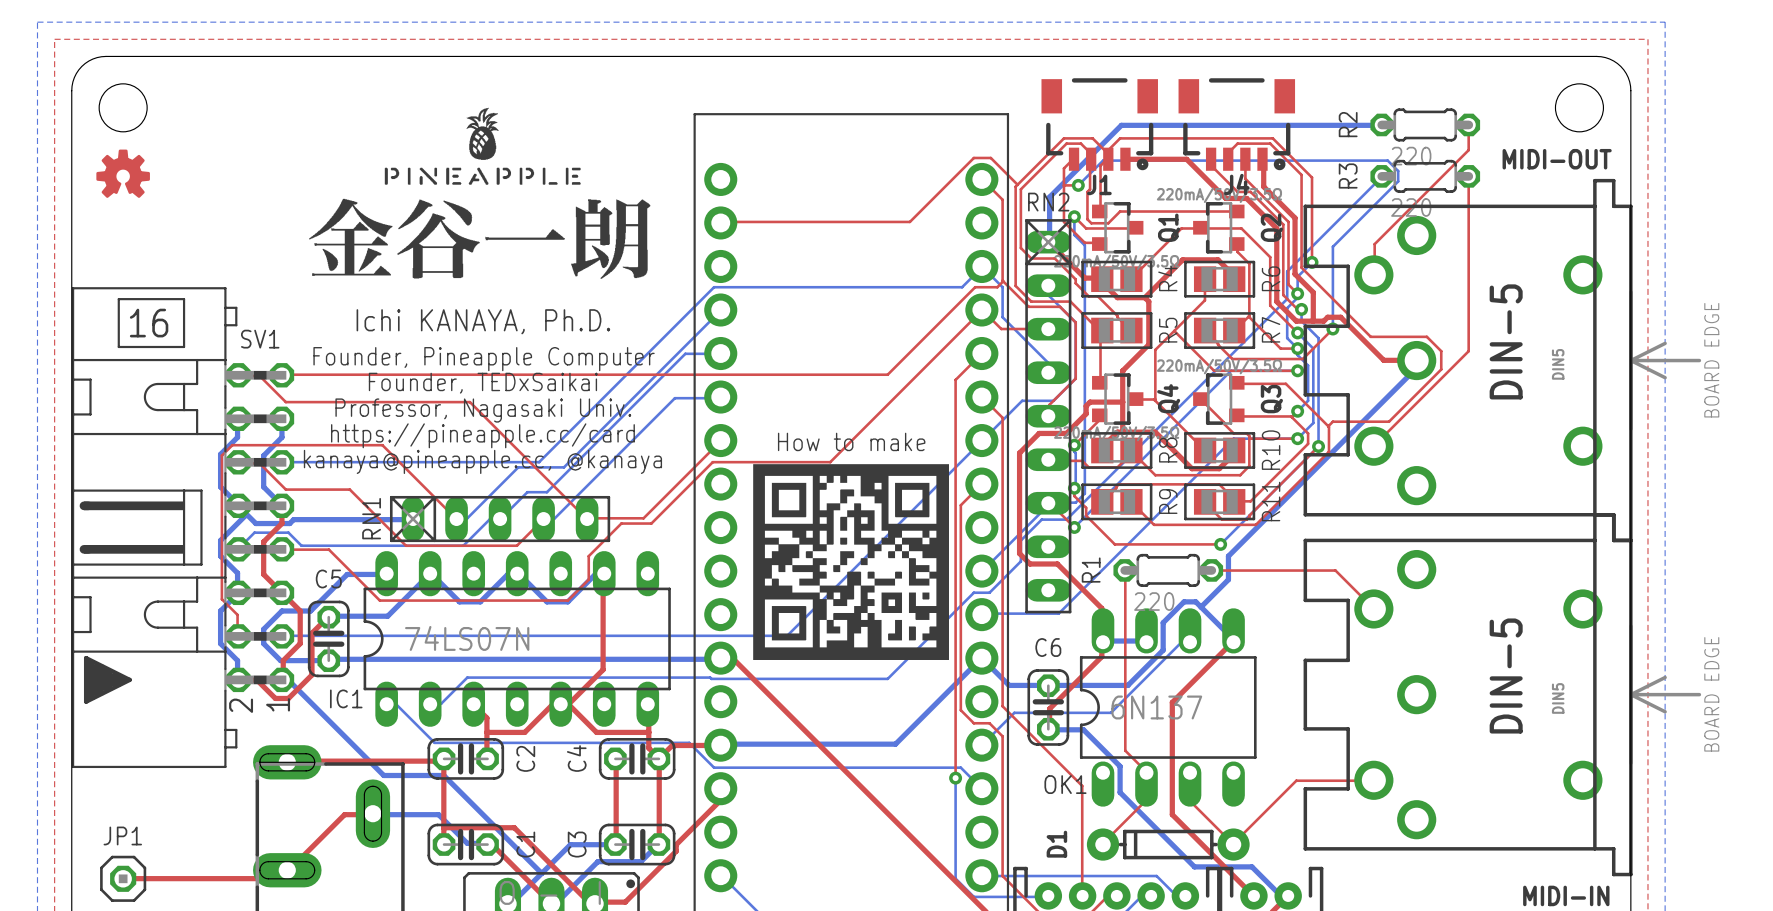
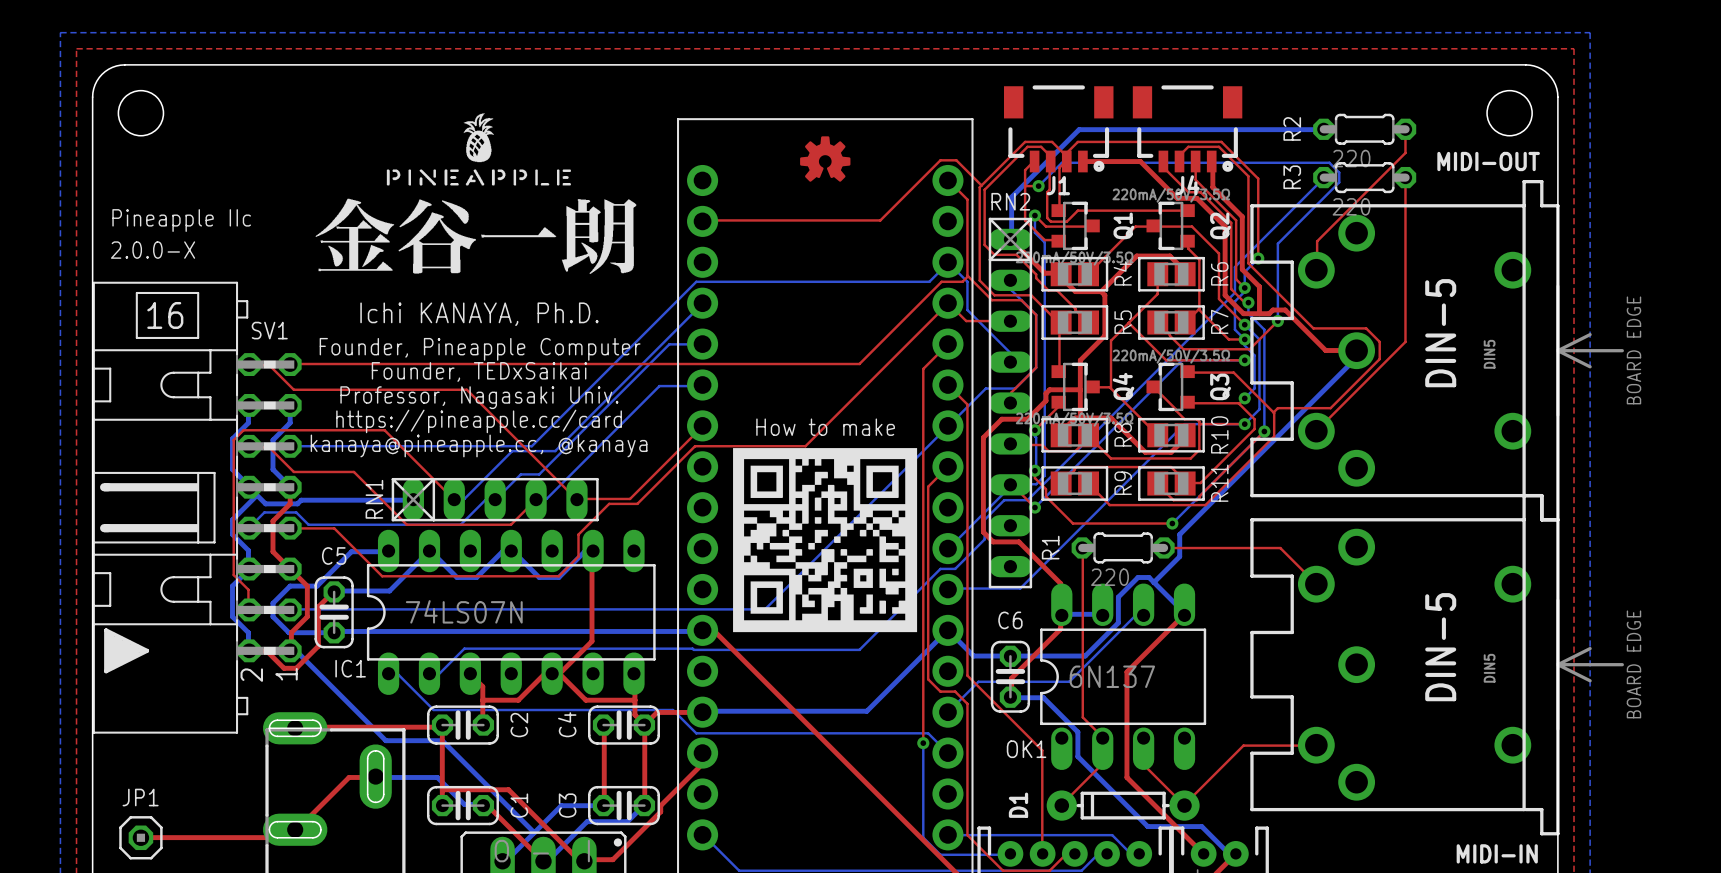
drawing: none -> [800, 136, 851, 182]
drawing: [96, 149, 150, 198] -> none
text: none -> Pineapple IIc (181, 220)
text: none -> 2.0.0-X (153, 250)

